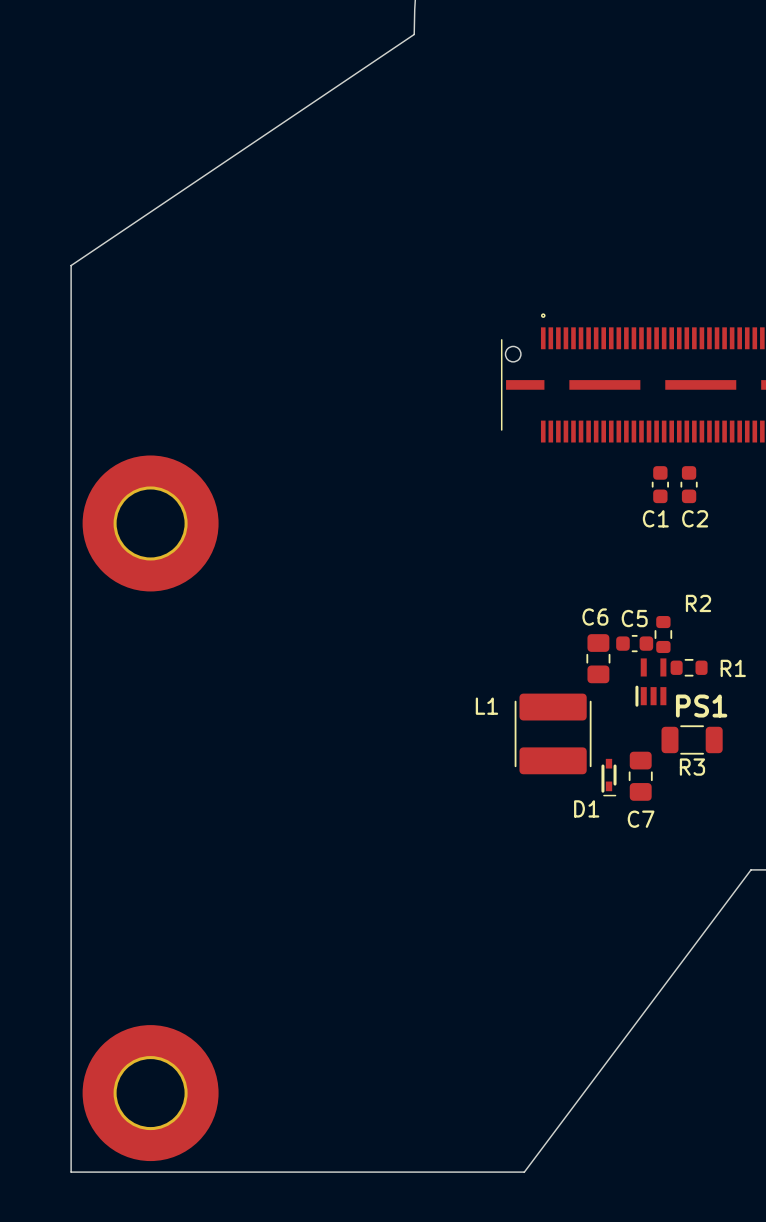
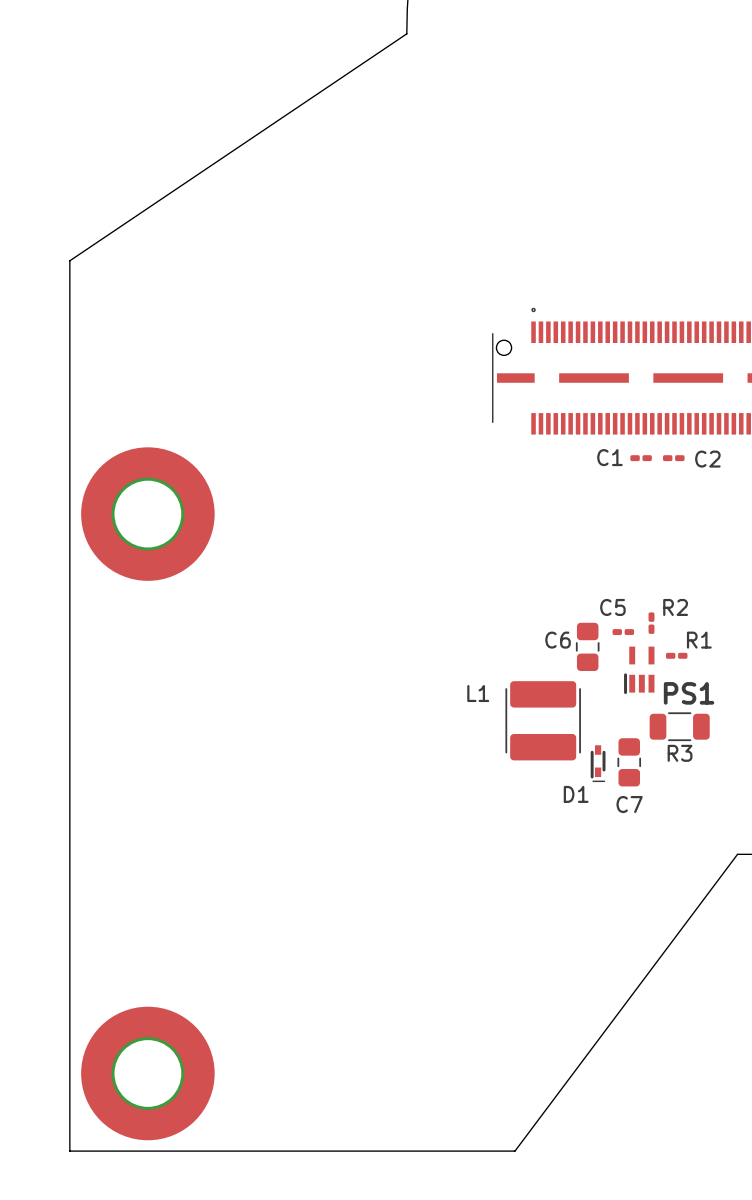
C1 footprint: [651, 466, 669, 504] -> [630, 455, 652, 462]
C2 footprint: [680, 466, 698, 504] -> [663, 455, 685, 462]
C1 name position: C1 (655, 518) -> C1 (609, 457)
C2 name position: C2 (695, 518) -> C2 (707, 459)
R2 footprint: [654, 616, 673, 654] -> [648, 612, 655, 634]
C6 name position: C6 (595, 617) -> C6 (558, 640)
C5 footprint: [616, 634, 654, 653] -> [612, 629, 635, 636]
R1 footprint: [670, 658, 708, 677] -> [665, 652, 688, 659]

